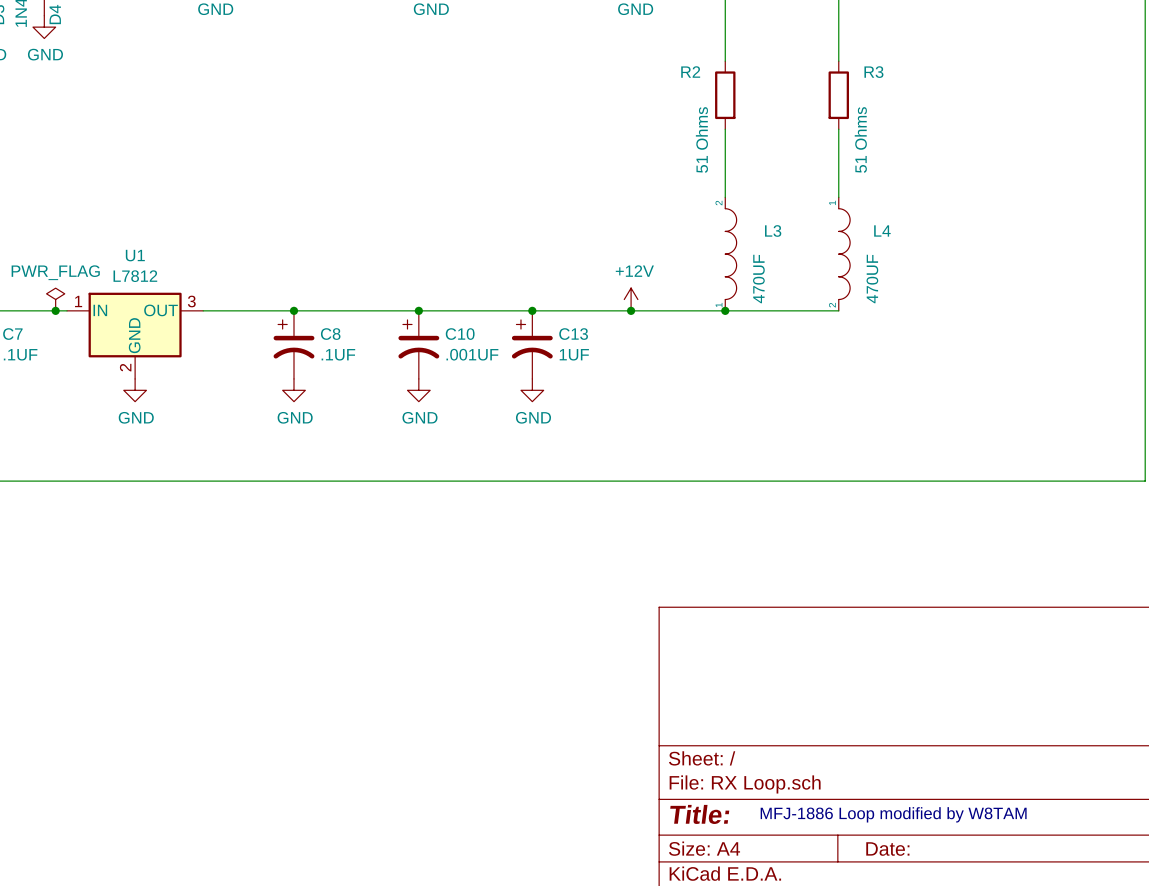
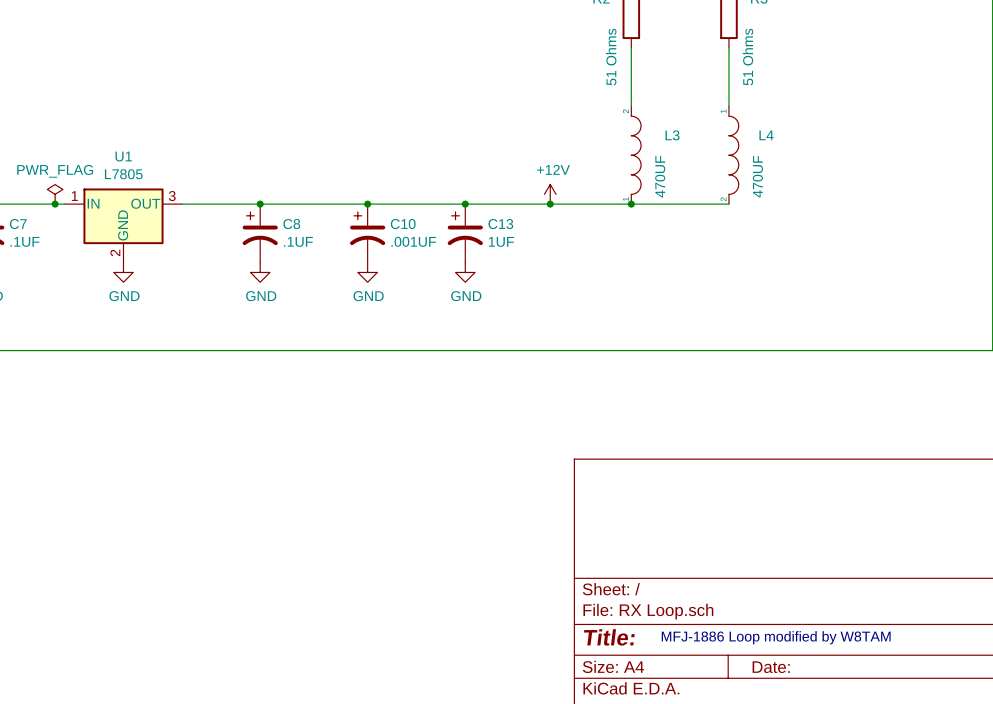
U1 value: L7812 (135, 276) -> L7805 (123, 174)

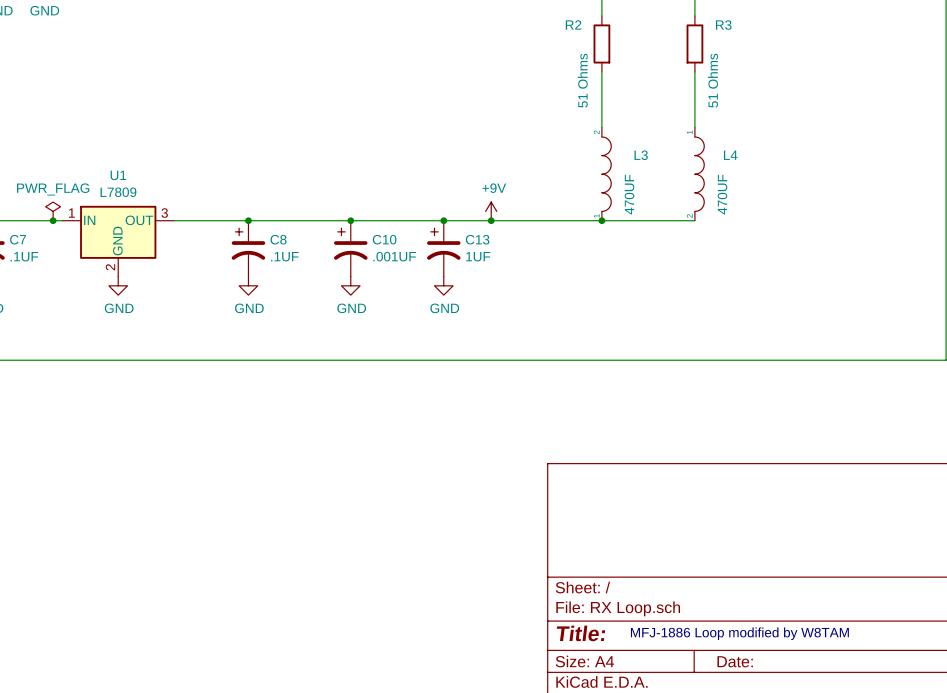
U1 value: L7805 (123, 174) -> L7809 (118, 192)
power symbol: none -> +9V (491, 211)
power symbol: +12V (550, 194) -> none
junction position: (550, 204) -> (491, 220)

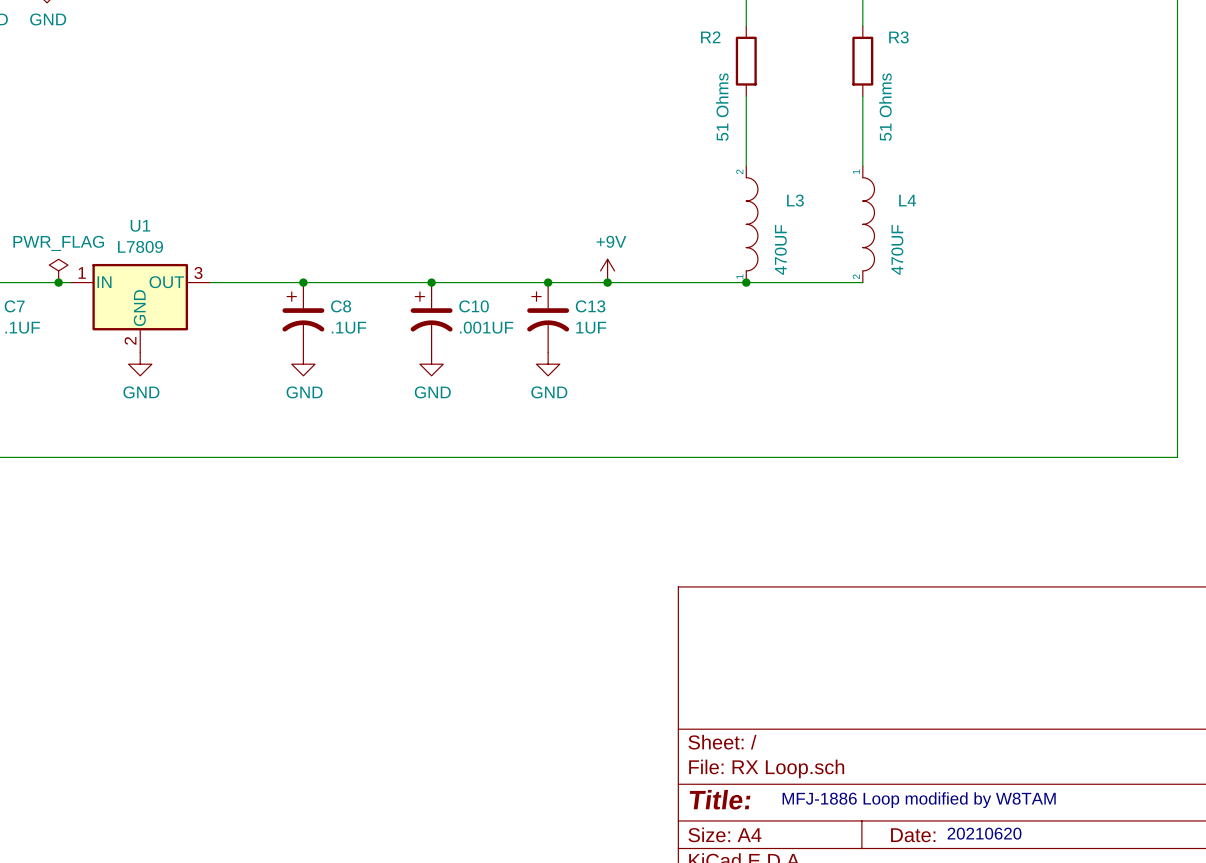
text: none -> 20210620 (984, 833)

